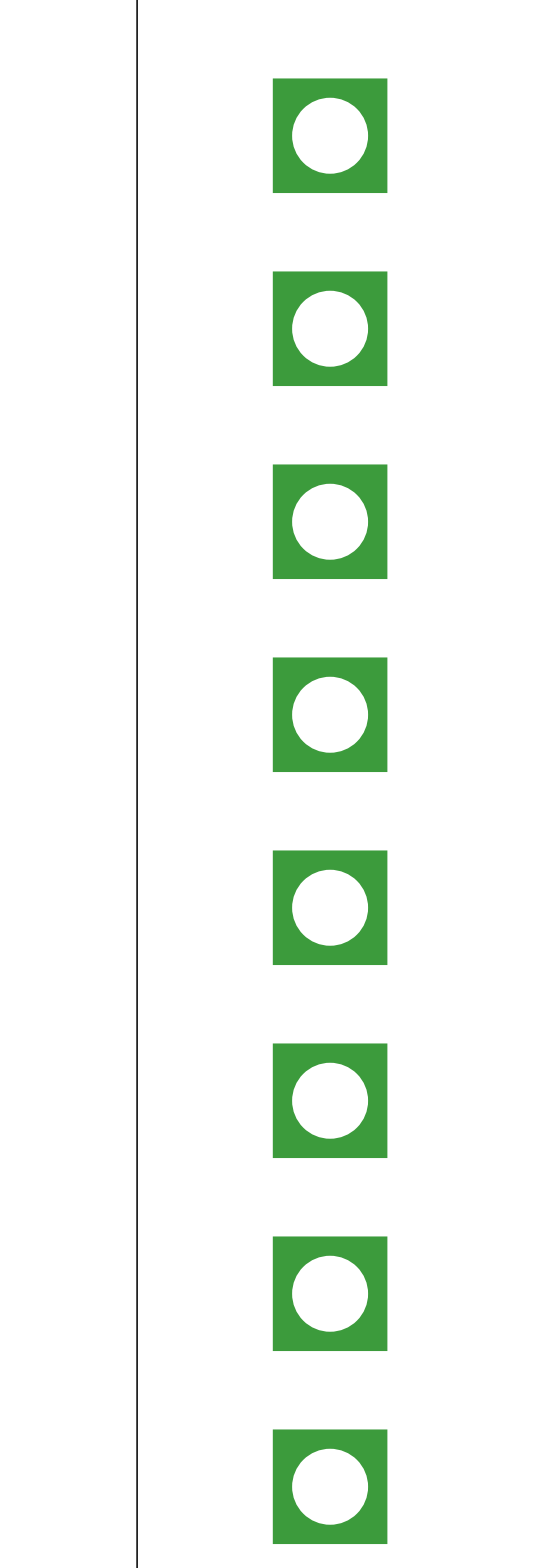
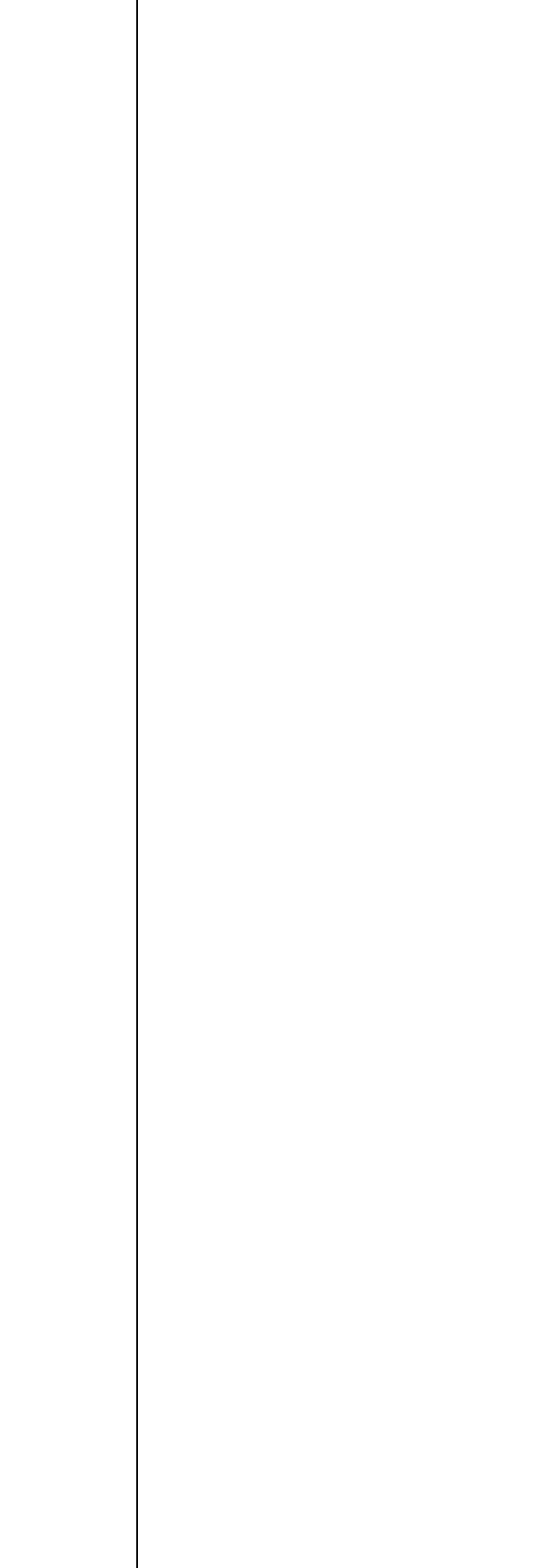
part: (330, 811) -> none

